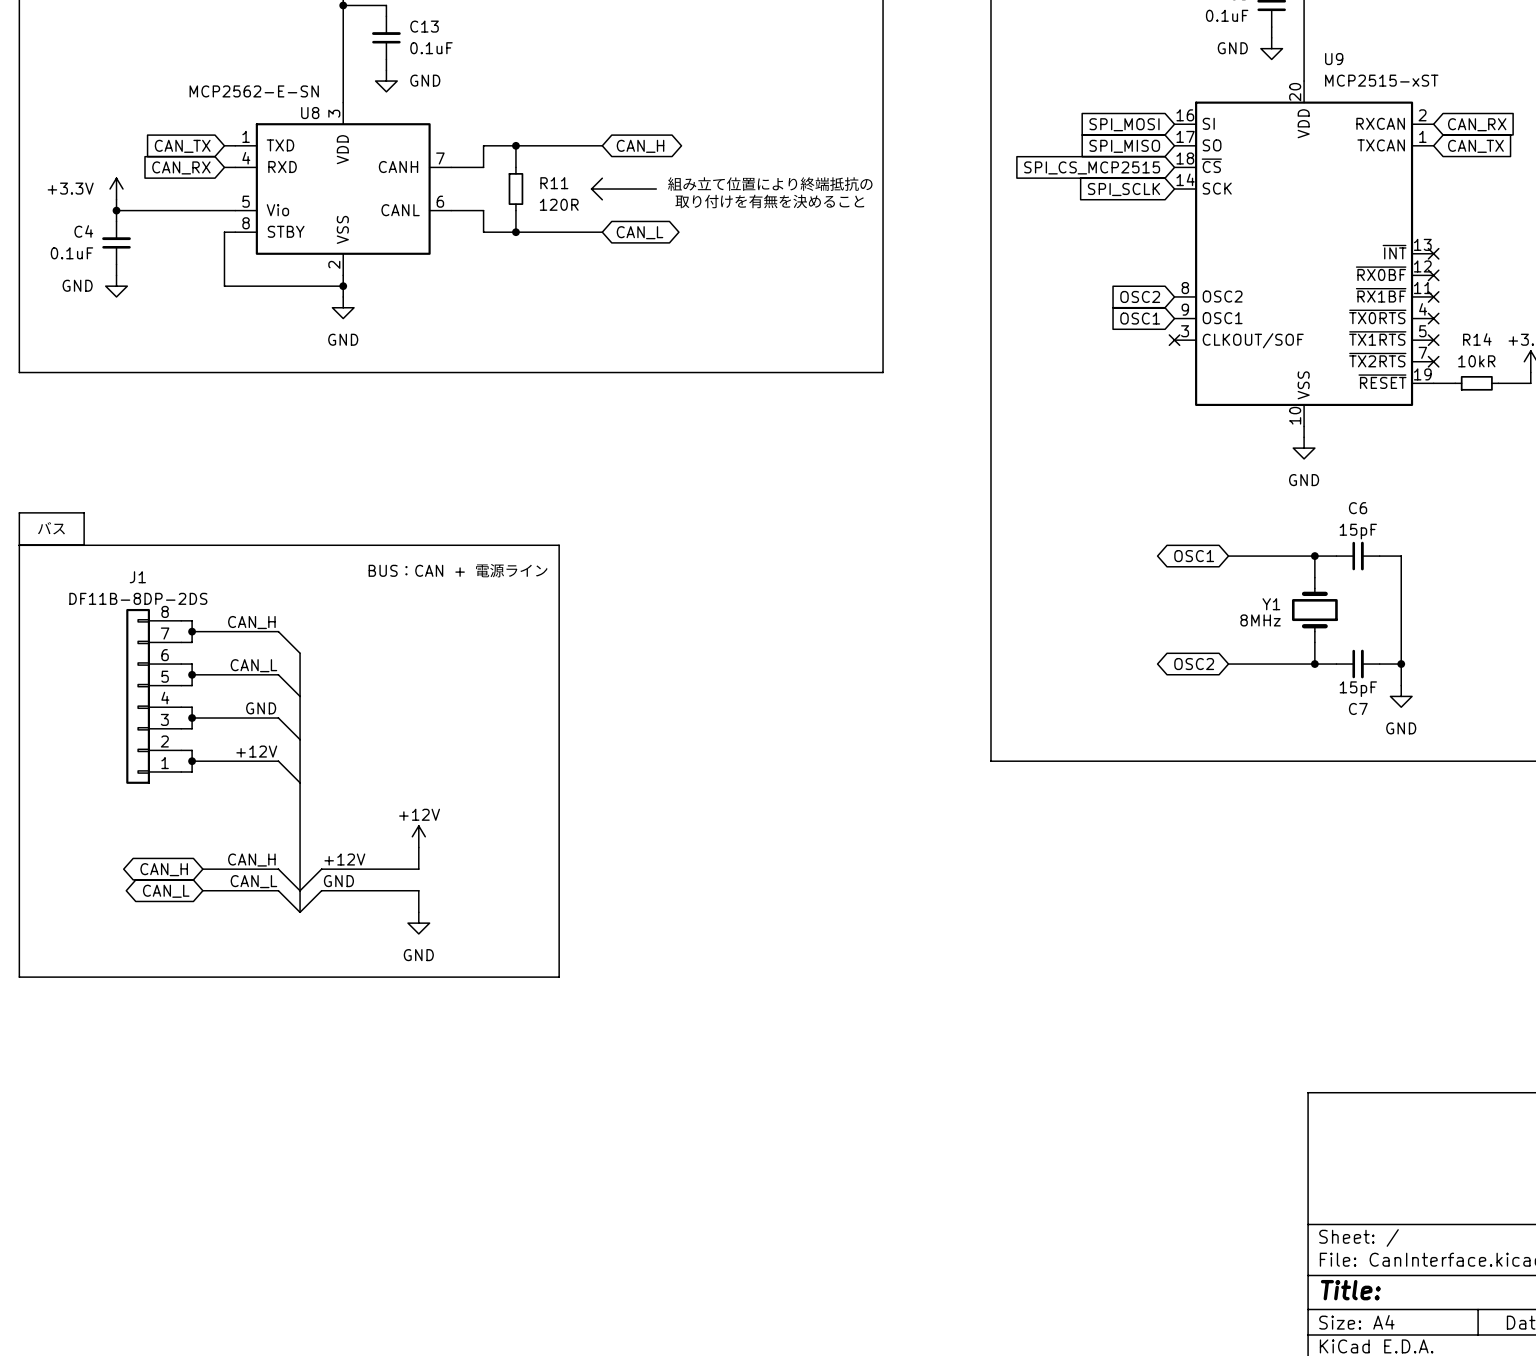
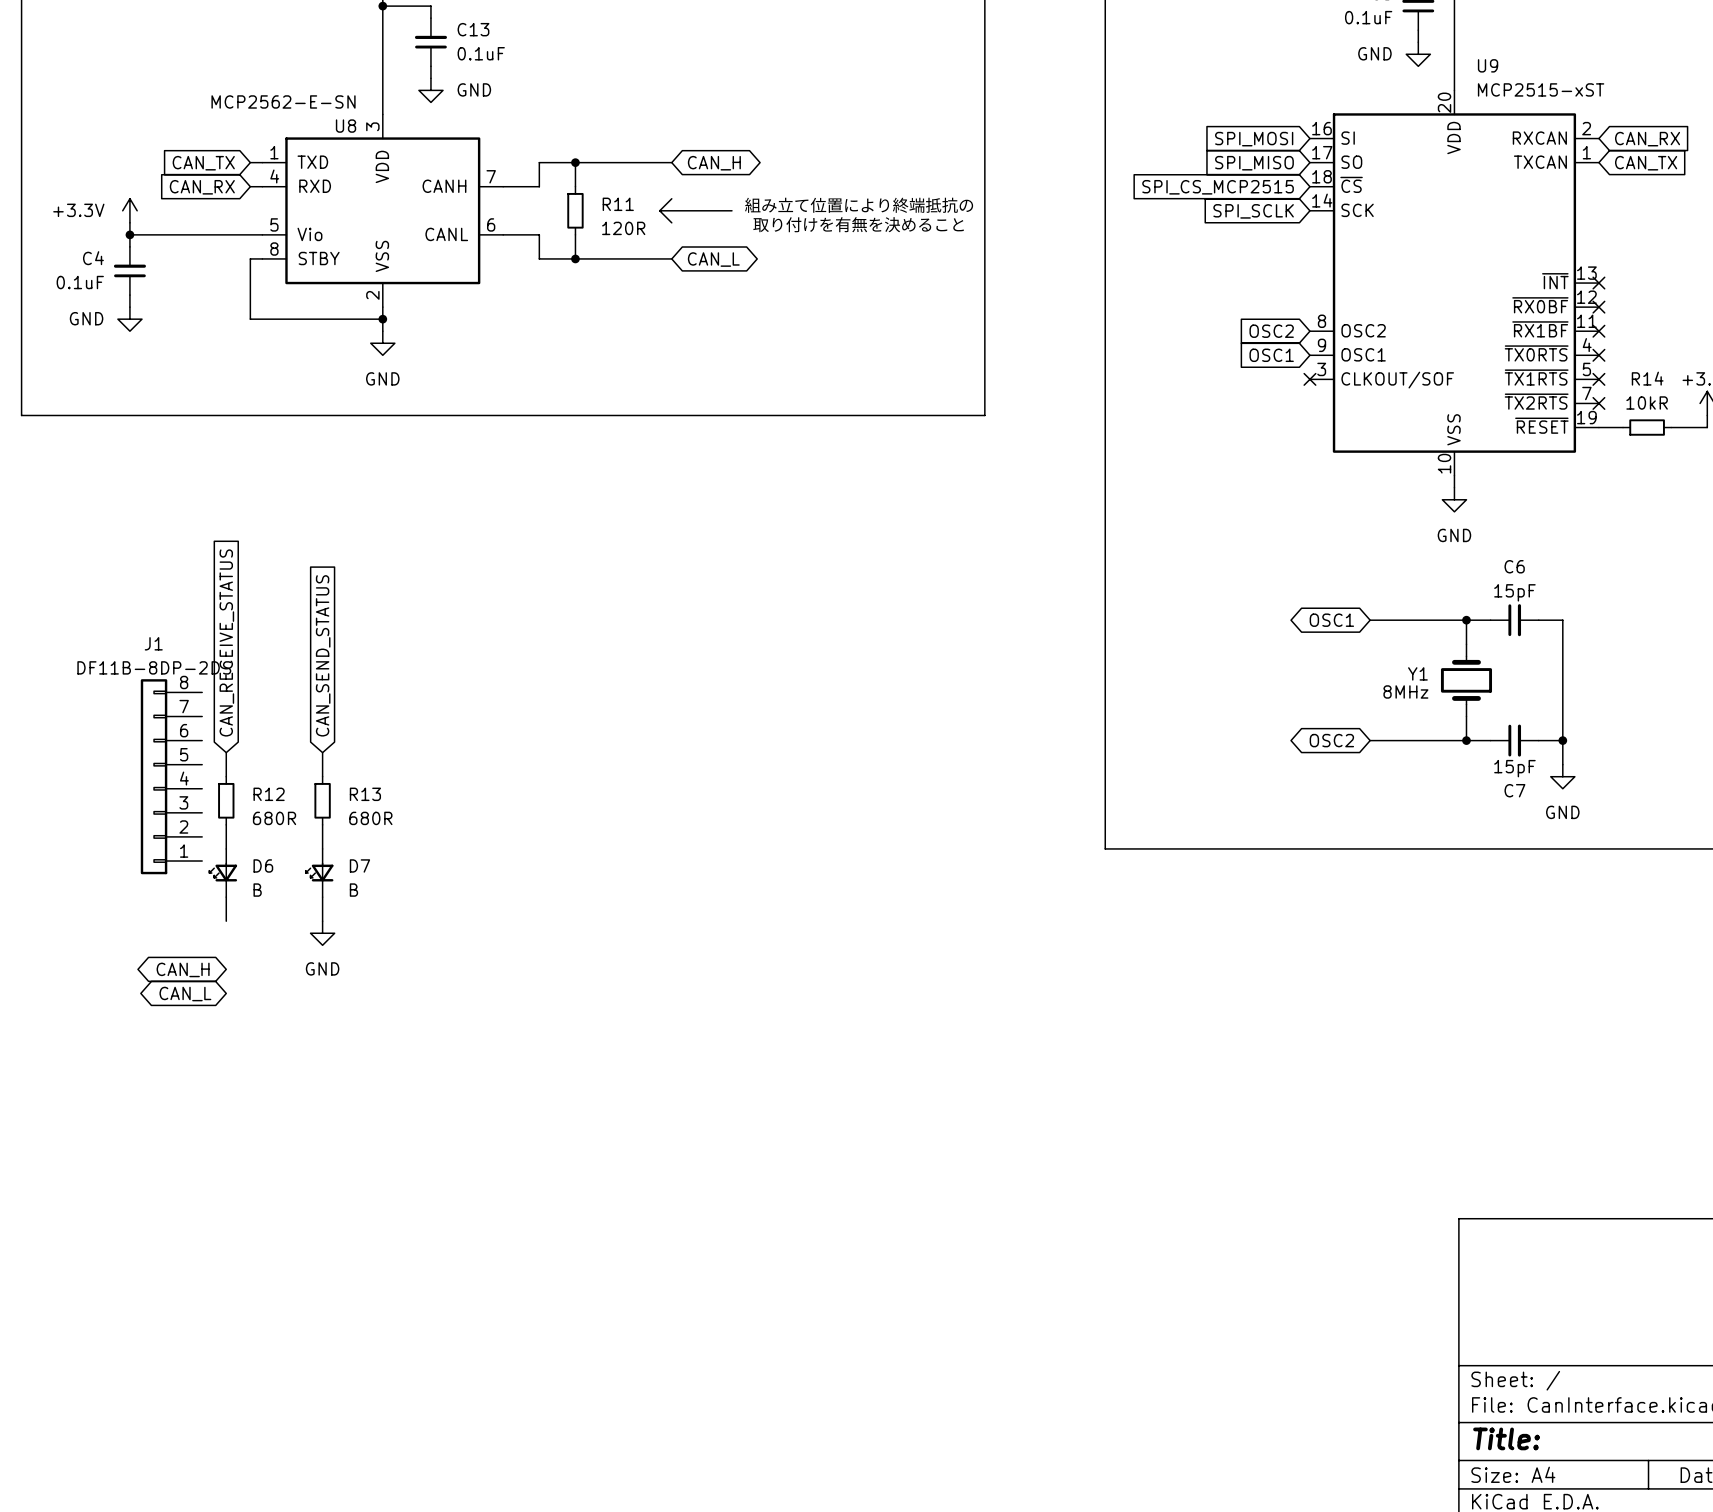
text: バス (51, 528) -> none
line: (19, 545) (559, 545) (559, 977) (19, 977) (19, 512) (84, 512) (84, 545) -> none
text: BUS：CAN + 電源ライン (458, 570) -> none
global label: none -> CAN_RECEIVE_STATUS (226, 642)
global label: none -> CAN_SEND_STATUS (323, 655)
wire: (181, 620) (192, 620) (192, 642) (181, 642) -> none
label: CAN_H (251, 622) -> none
wire: (192, 631) (278, 631) (300, 653) -> none
junction: (192, 631) -> none
bus: (300, 653) (300, 912) -> none
wire: (181, 664) (192, 664) (192, 685) (181, 685) -> none
label: CAN_L (253, 665) -> none
wire: (192, 674) (278, 674) (300, 696) -> none
junction: (192, 674) -> none
wire: none -> (226, 752) (226, 776)
wire: none -> (322, 752) (322, 776)
wire: (181, 707) (192, 707) (192, 728) (181, 728) -> none
label: GND (261, 708) -> none
wire: (192, 718) (278, 718) (300, 739) -> none
junction: (192, 718) -> none
R12: none -> 680R (226, 800)
R13: none -> 680R (322, 800)
wire: none -> (226, 824) (226, 848)
wire: none -> (322, 824) (322, 848)
wire: (181, 750) (192, 750) (192, 771) (181, 771) -> none
label: +12V (256, 751) -> none
wire: (192, 761) (278, 761) (300, 782) -> none
junction: (192, 761) -> none
D6: none -> B (223, 873)
D7: none -> B (319, 873)
wire: none -> (226, 897) (226, 921)
wire: none -> (322, 897) (322, 921)
power symbol: +12V (418, 836) -> none
wire: (418, 847) (418, 869) (321, 869) (300, 890) (278, 869) (202, 869) -> none
label: +12V (344, 859) -> none
label: CAN_H (251, 860) -> none
label: CAN_L (253, 881) -> none
label: GND (338, 881) -> none
wire: (202, 890) (278, 890) (300, 912) (321, 890) (418, 890) (418, 912) -> none
power symbol position: GND (418, 923) -> GND (322, 933)

